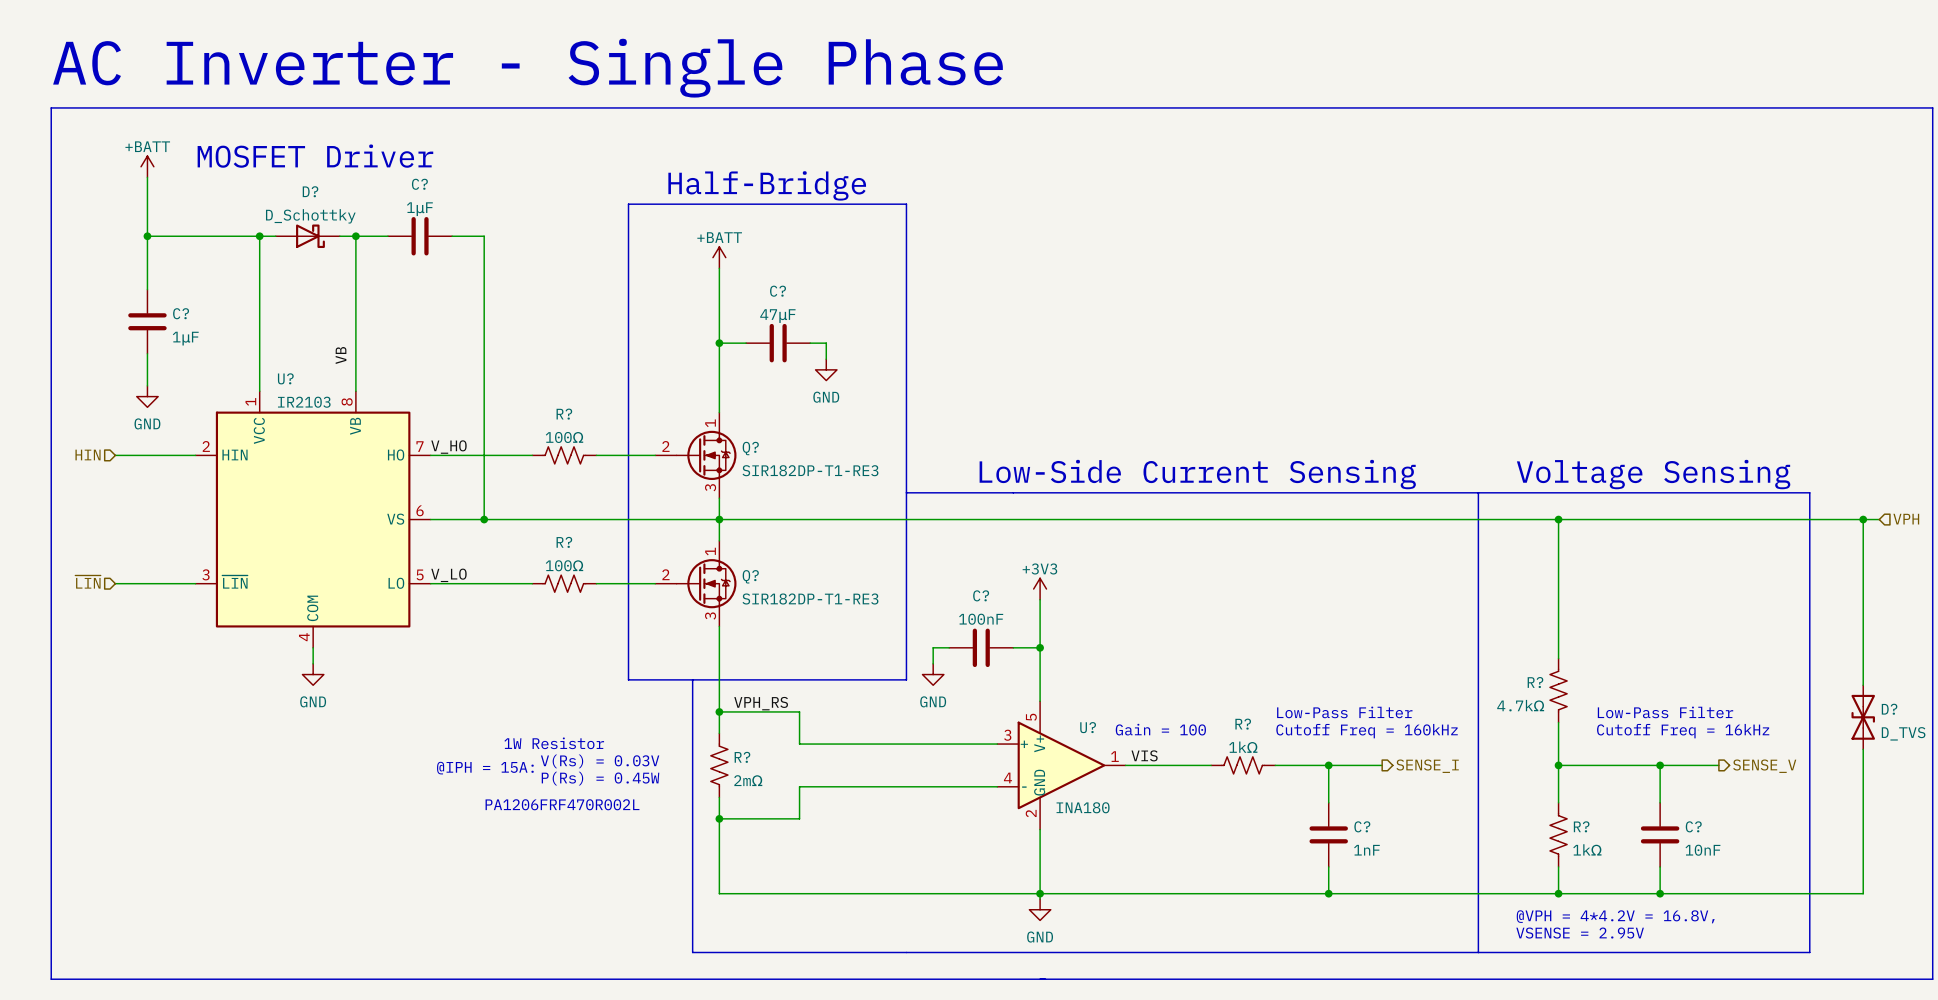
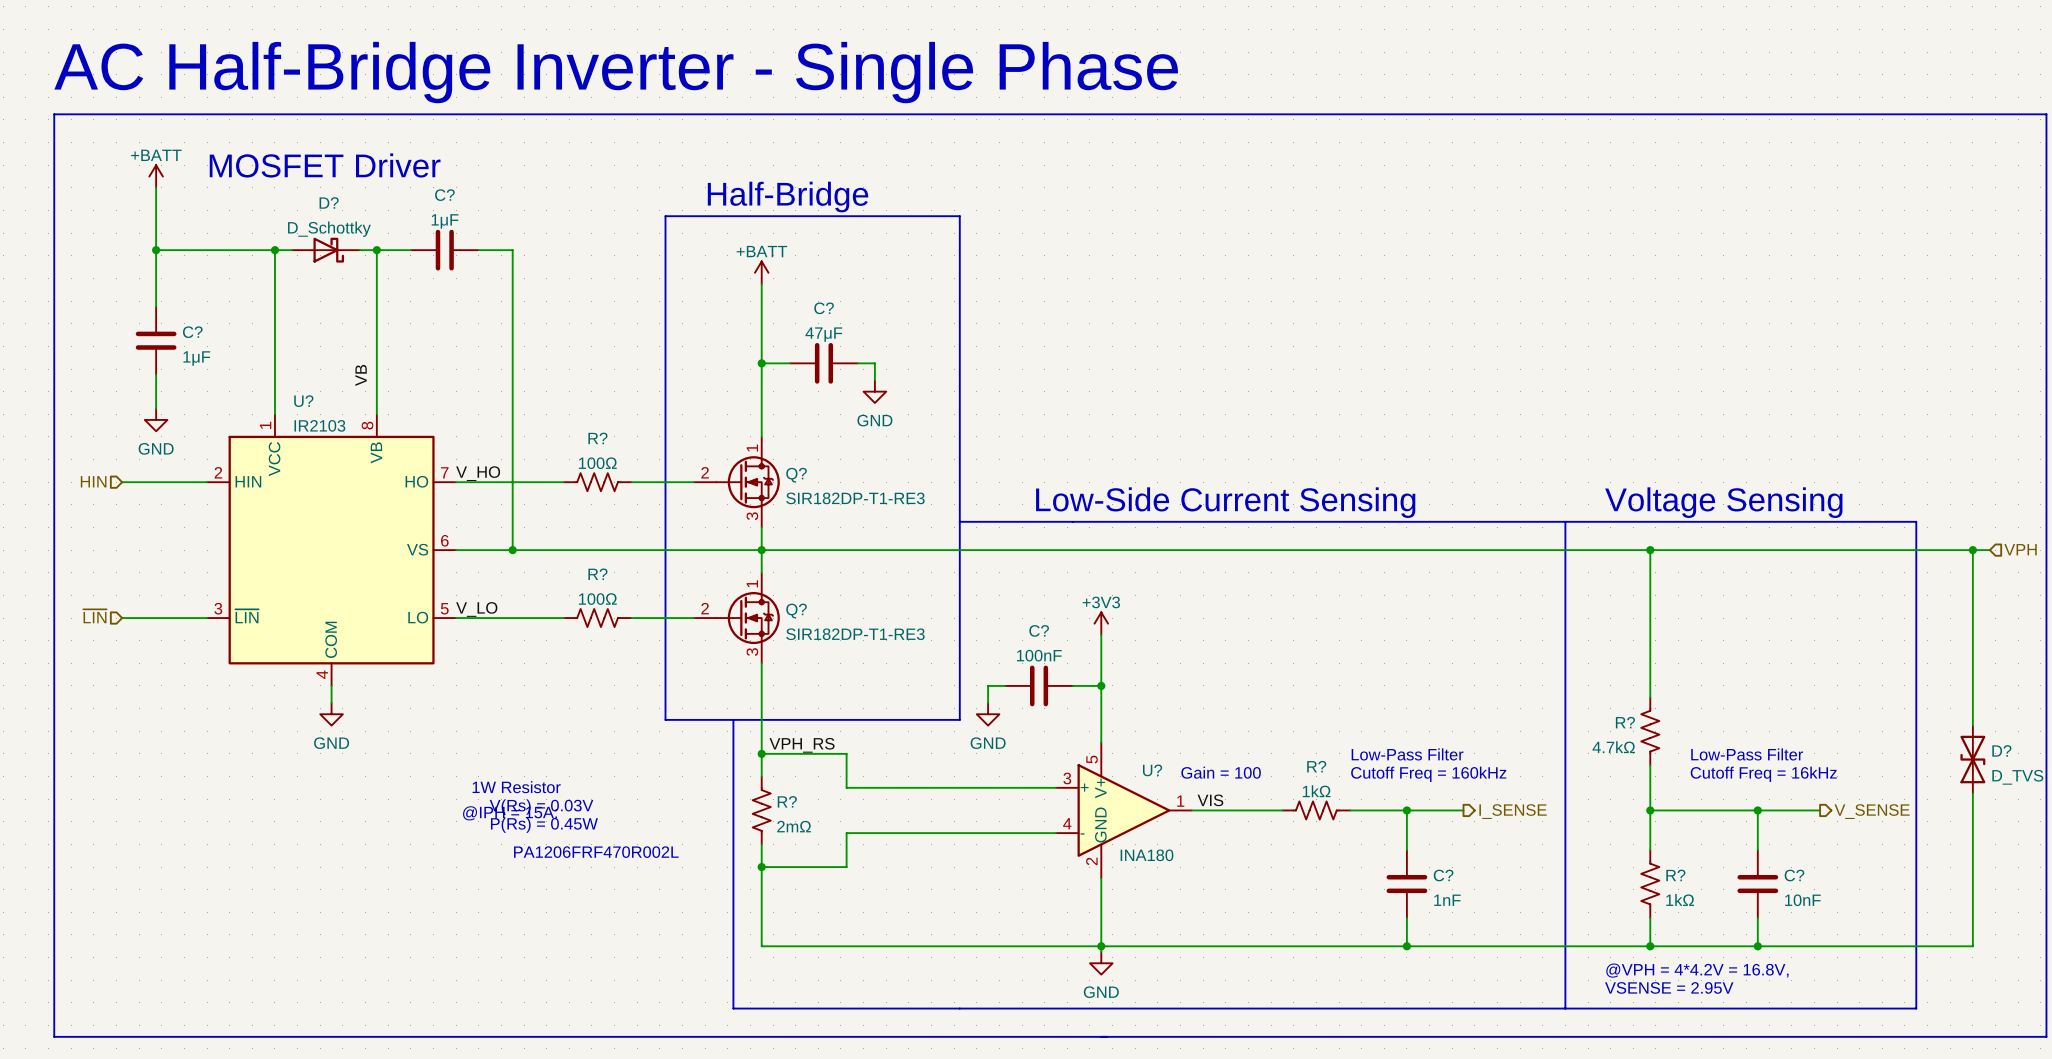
text: AC Inverter - Single Phase (527, 68) -> AC Half-Bridge Inverter - Single Phase (616, 72)
hierarchical label: SENSE_I (1427, 766) -> I_SENSE (1513, 811)
hierarchical label: SENSE_V (1764, 766) -> V_SENSE (1872, 811)

